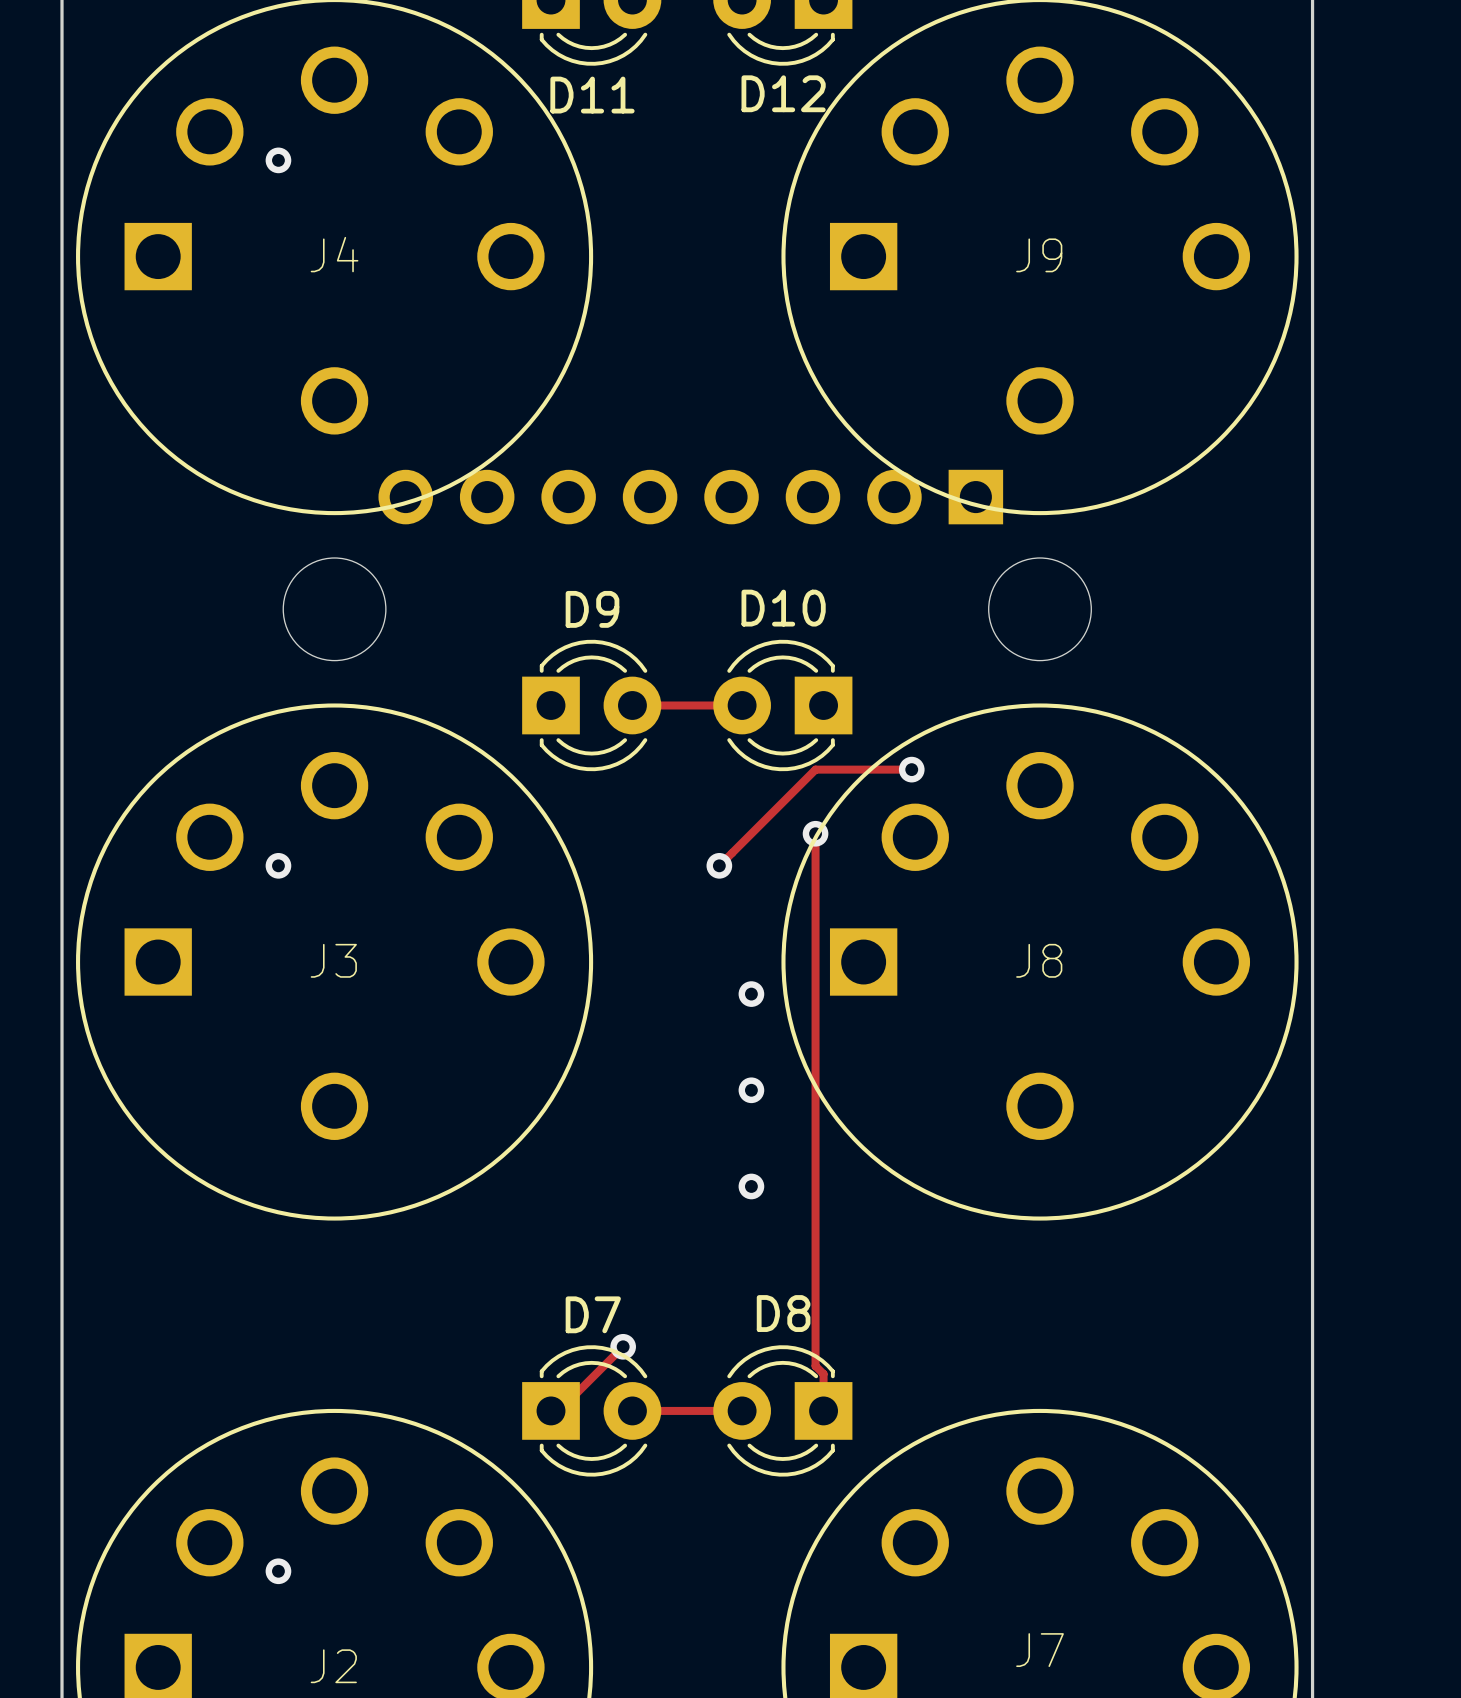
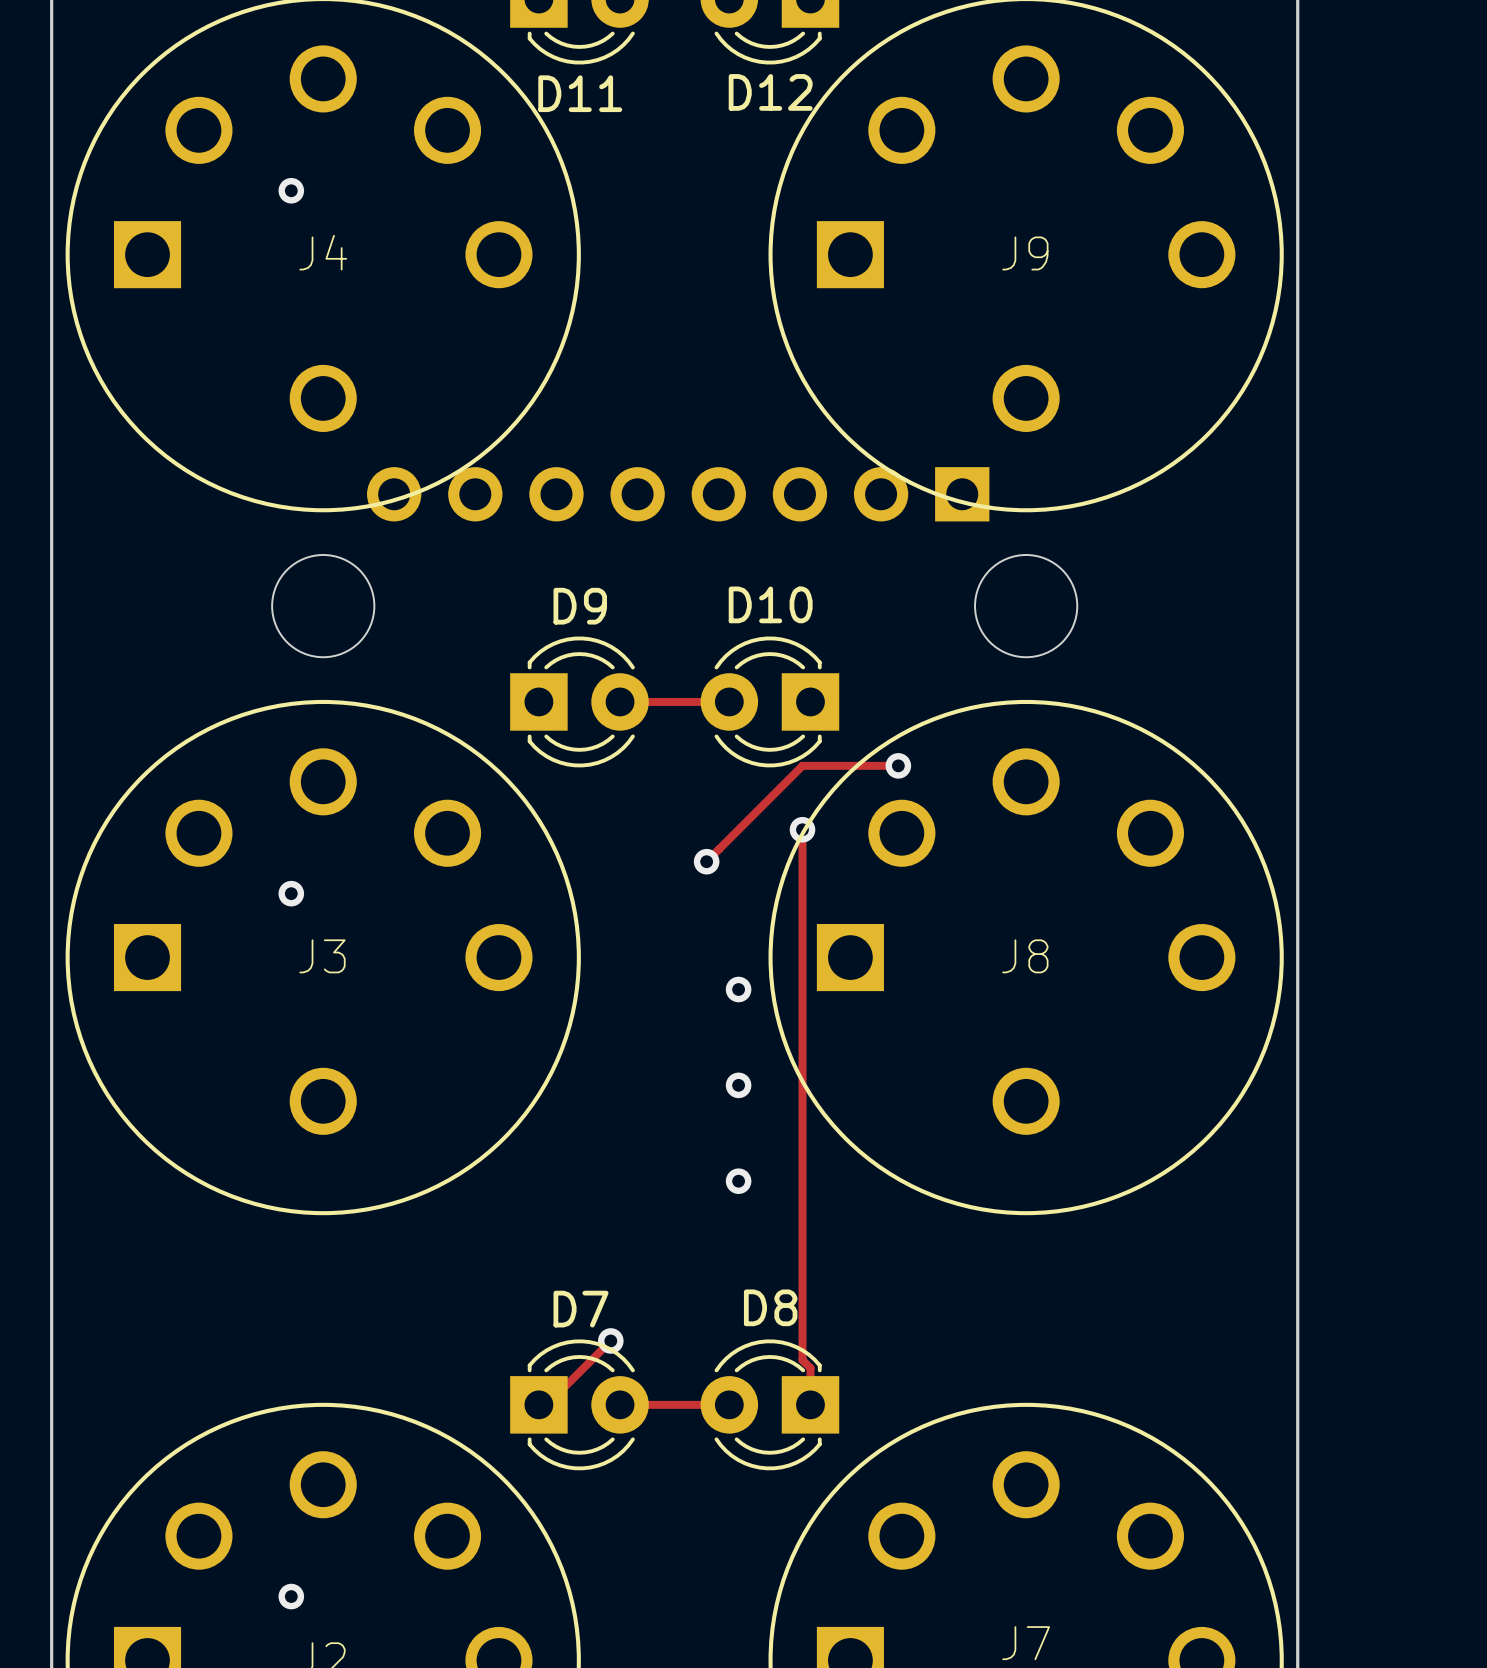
via position: (278, 160) -> (291, 190)
via position: (278, 865) -> (291, 893)
via position: (278, 1571) -> (291, 1596)

